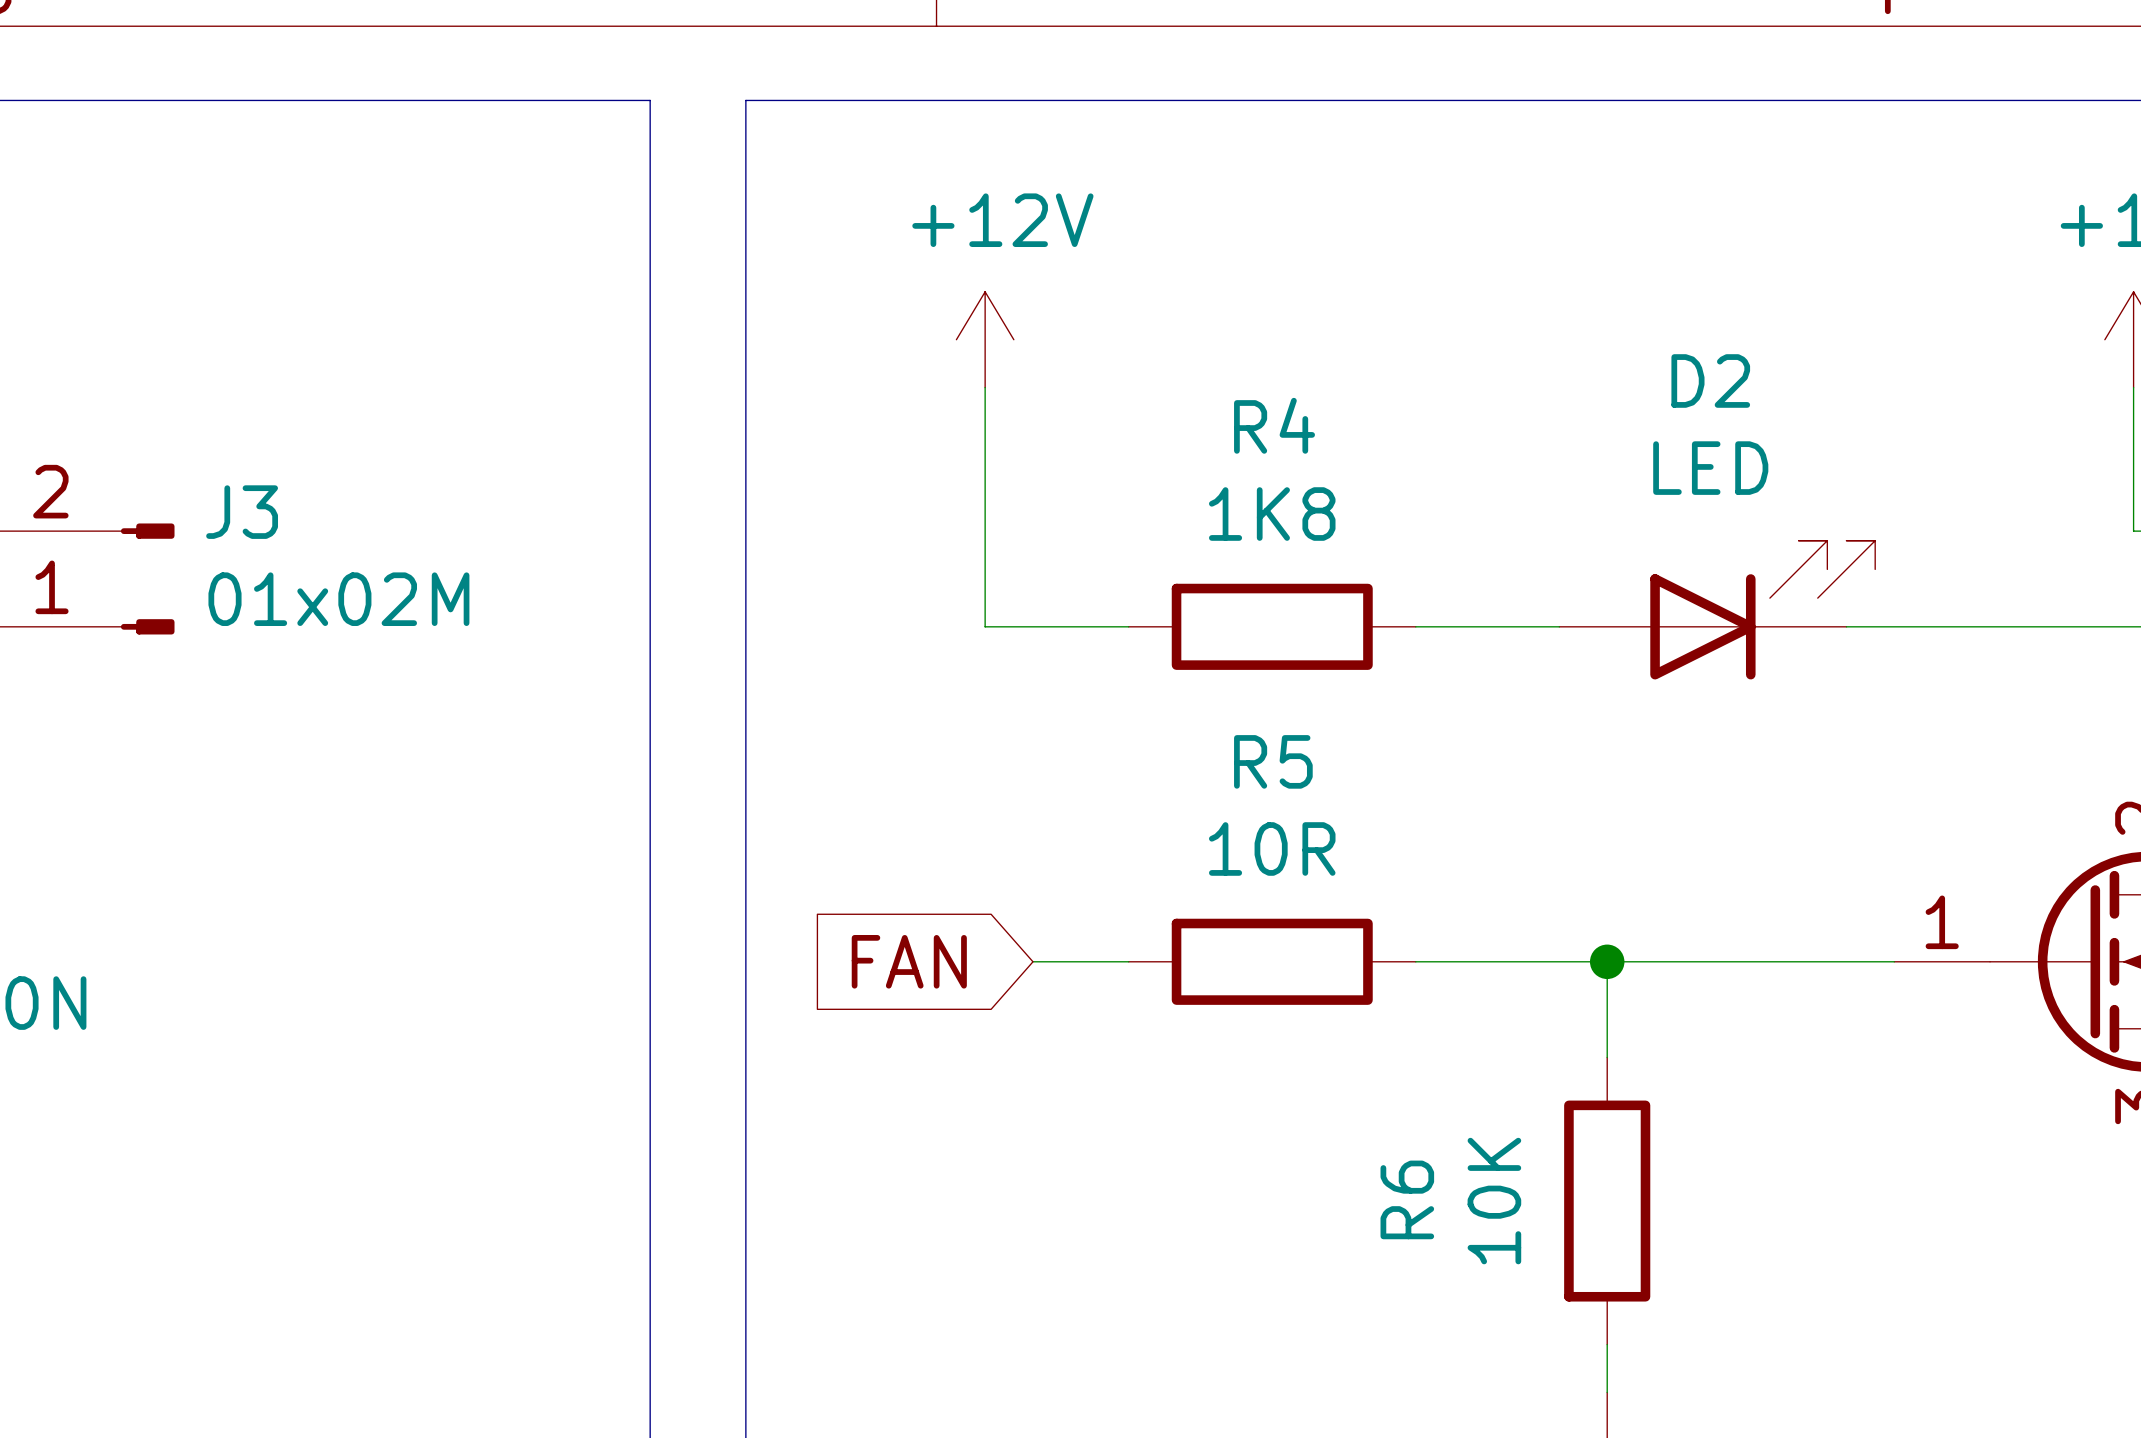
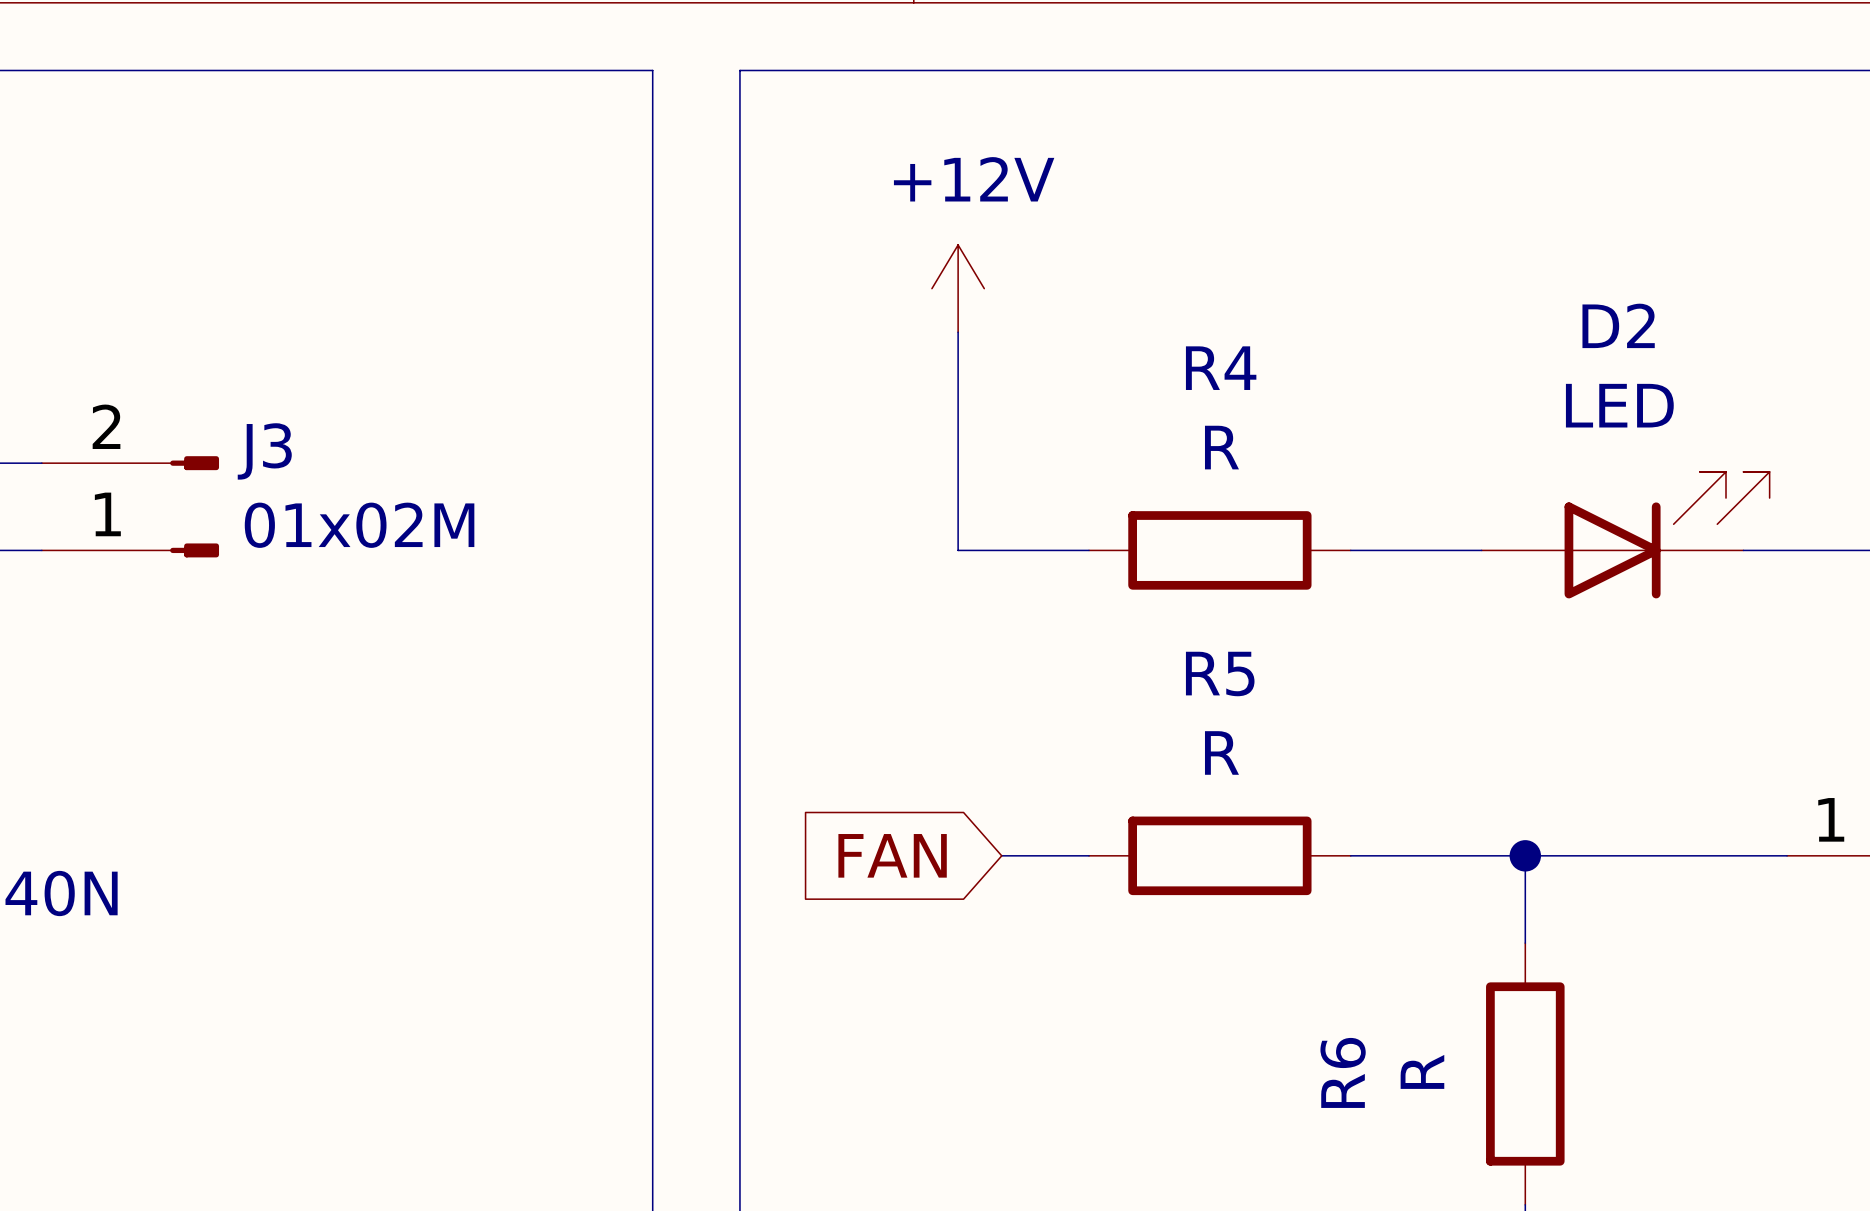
R4 value: 1K8 (1272, 514) -> R (1221, 447)
R5 value: 10R (1272, 848) -> R (1221, 752)
R6 value: 10K (1494, 1201) -> R (1422, 1071)

